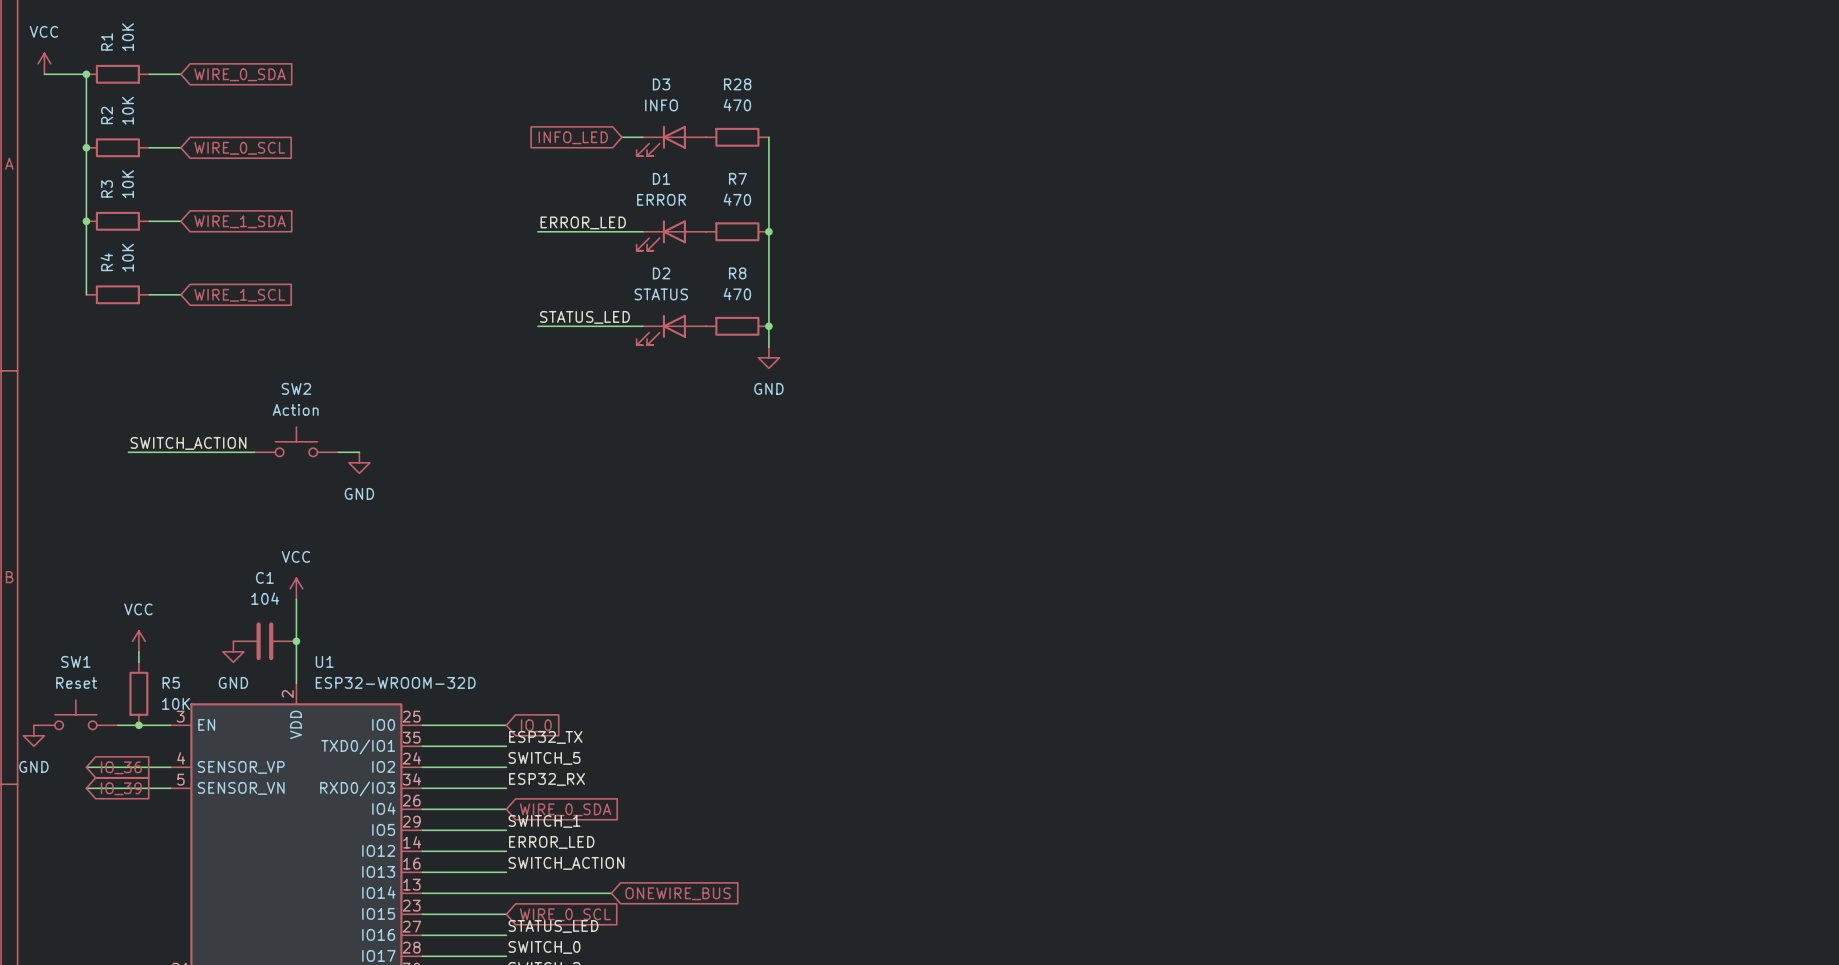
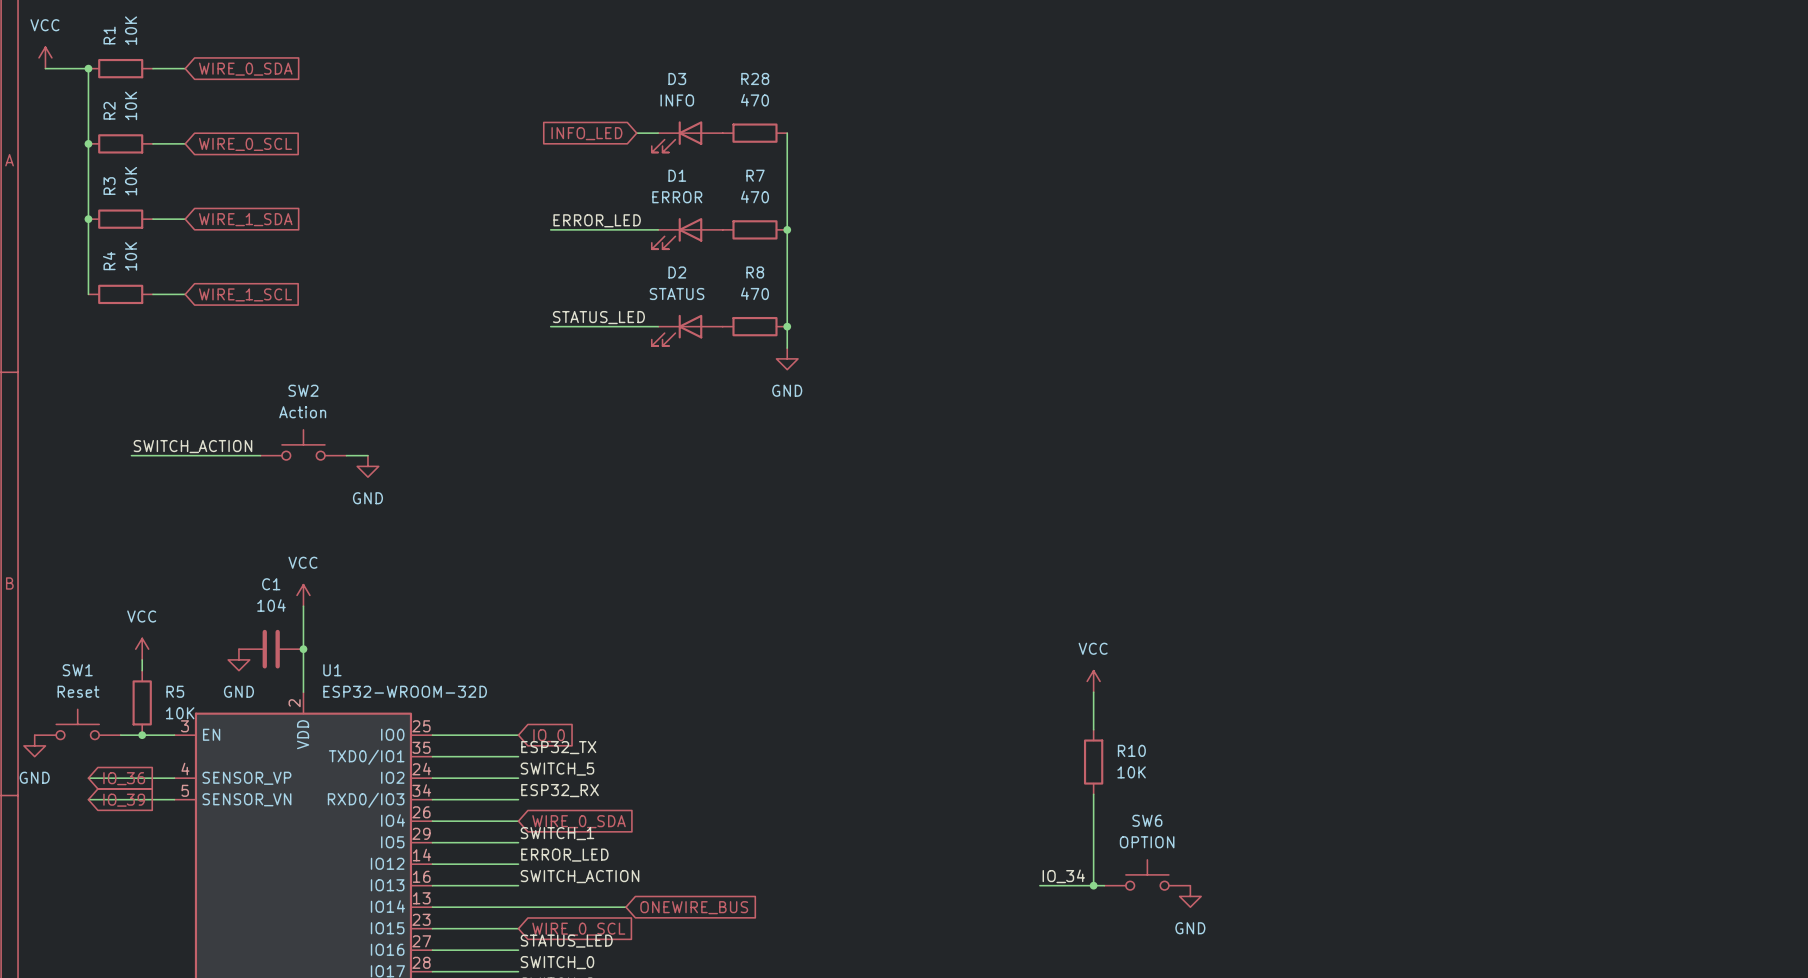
power symbol: none -> VCC (1093, 681)
wire: none -> (1093, 692) (1093, 729)
R10: none -> 10K (1093, 762)
wire: none -> (1093, 794) (1093, 885)
SW6: none -> OPTION (1147, 874)
label: none -> IO_34 (1063, 876)
wire: none -> (1039, 885) (1104, 885)
junction: none -> (1093, 885)
power symbol: none -> GND (1190, 896)

